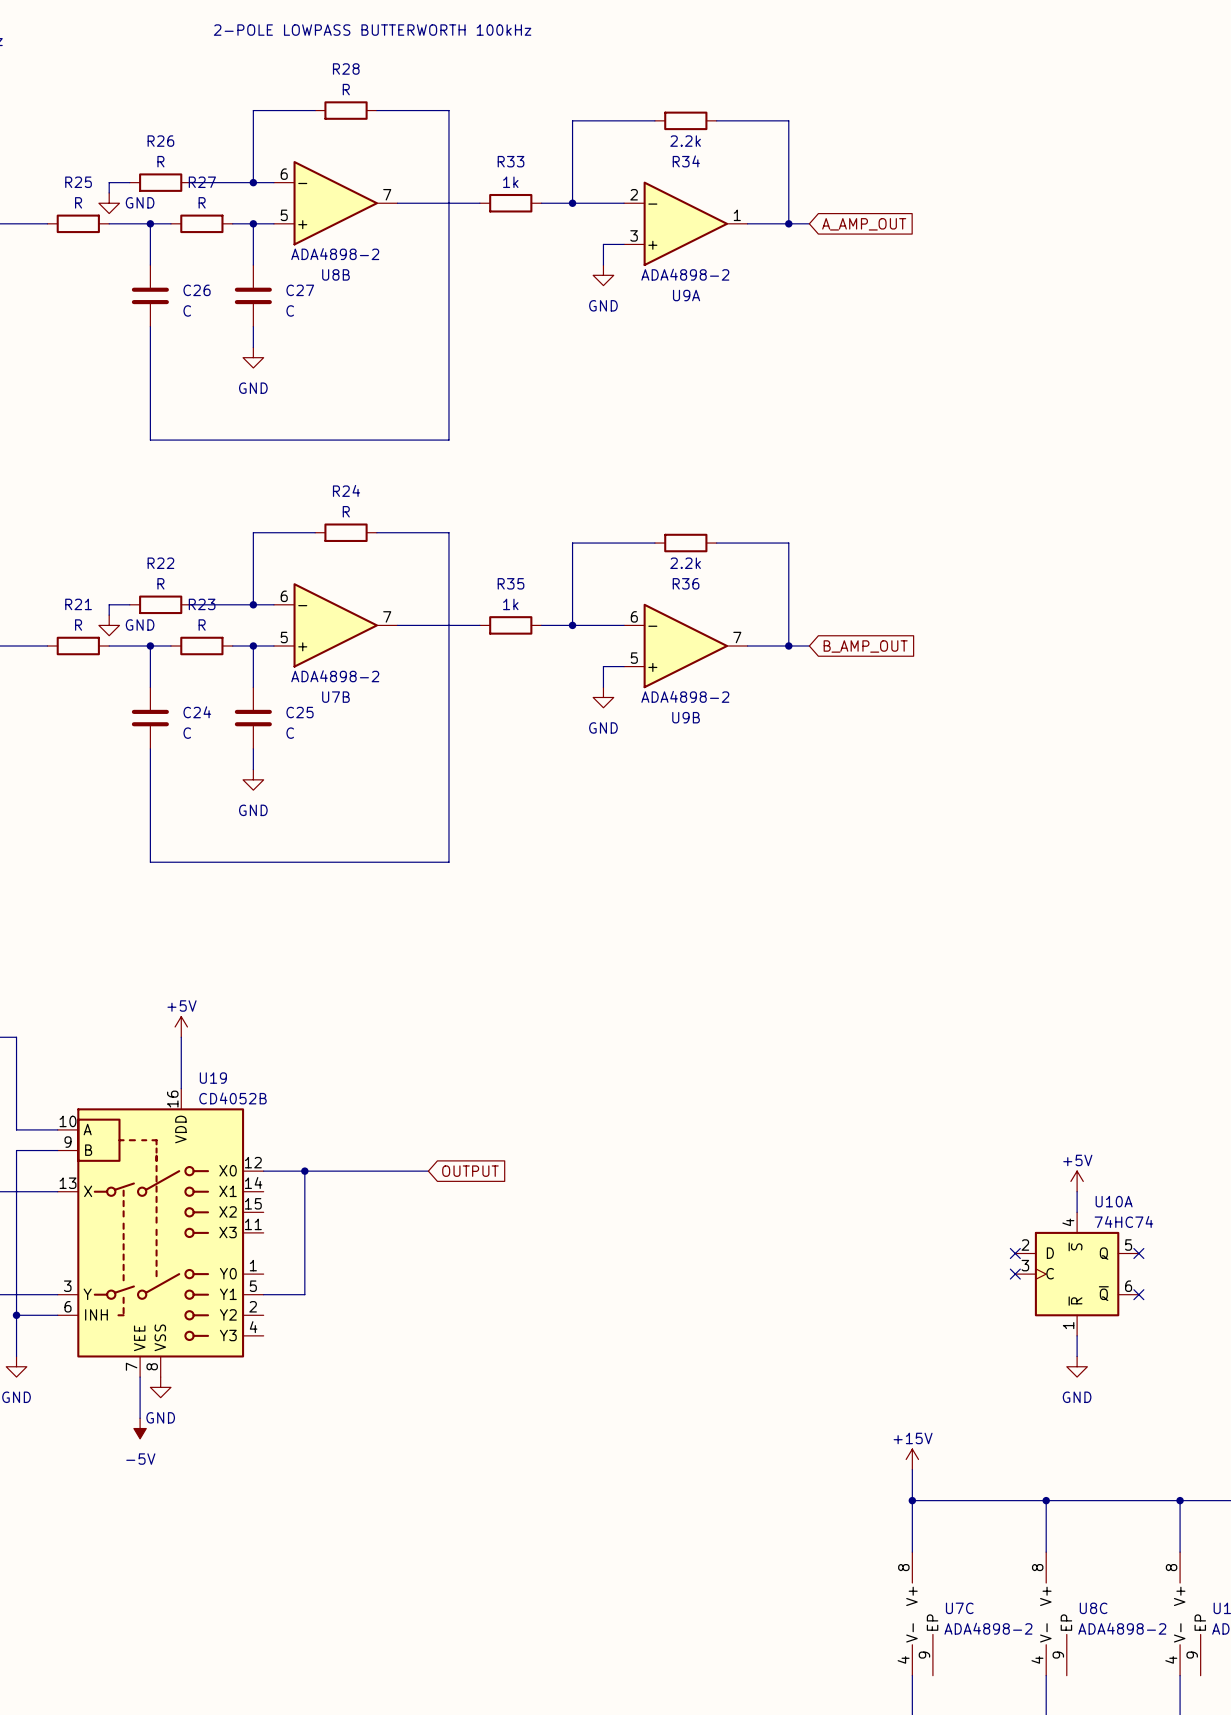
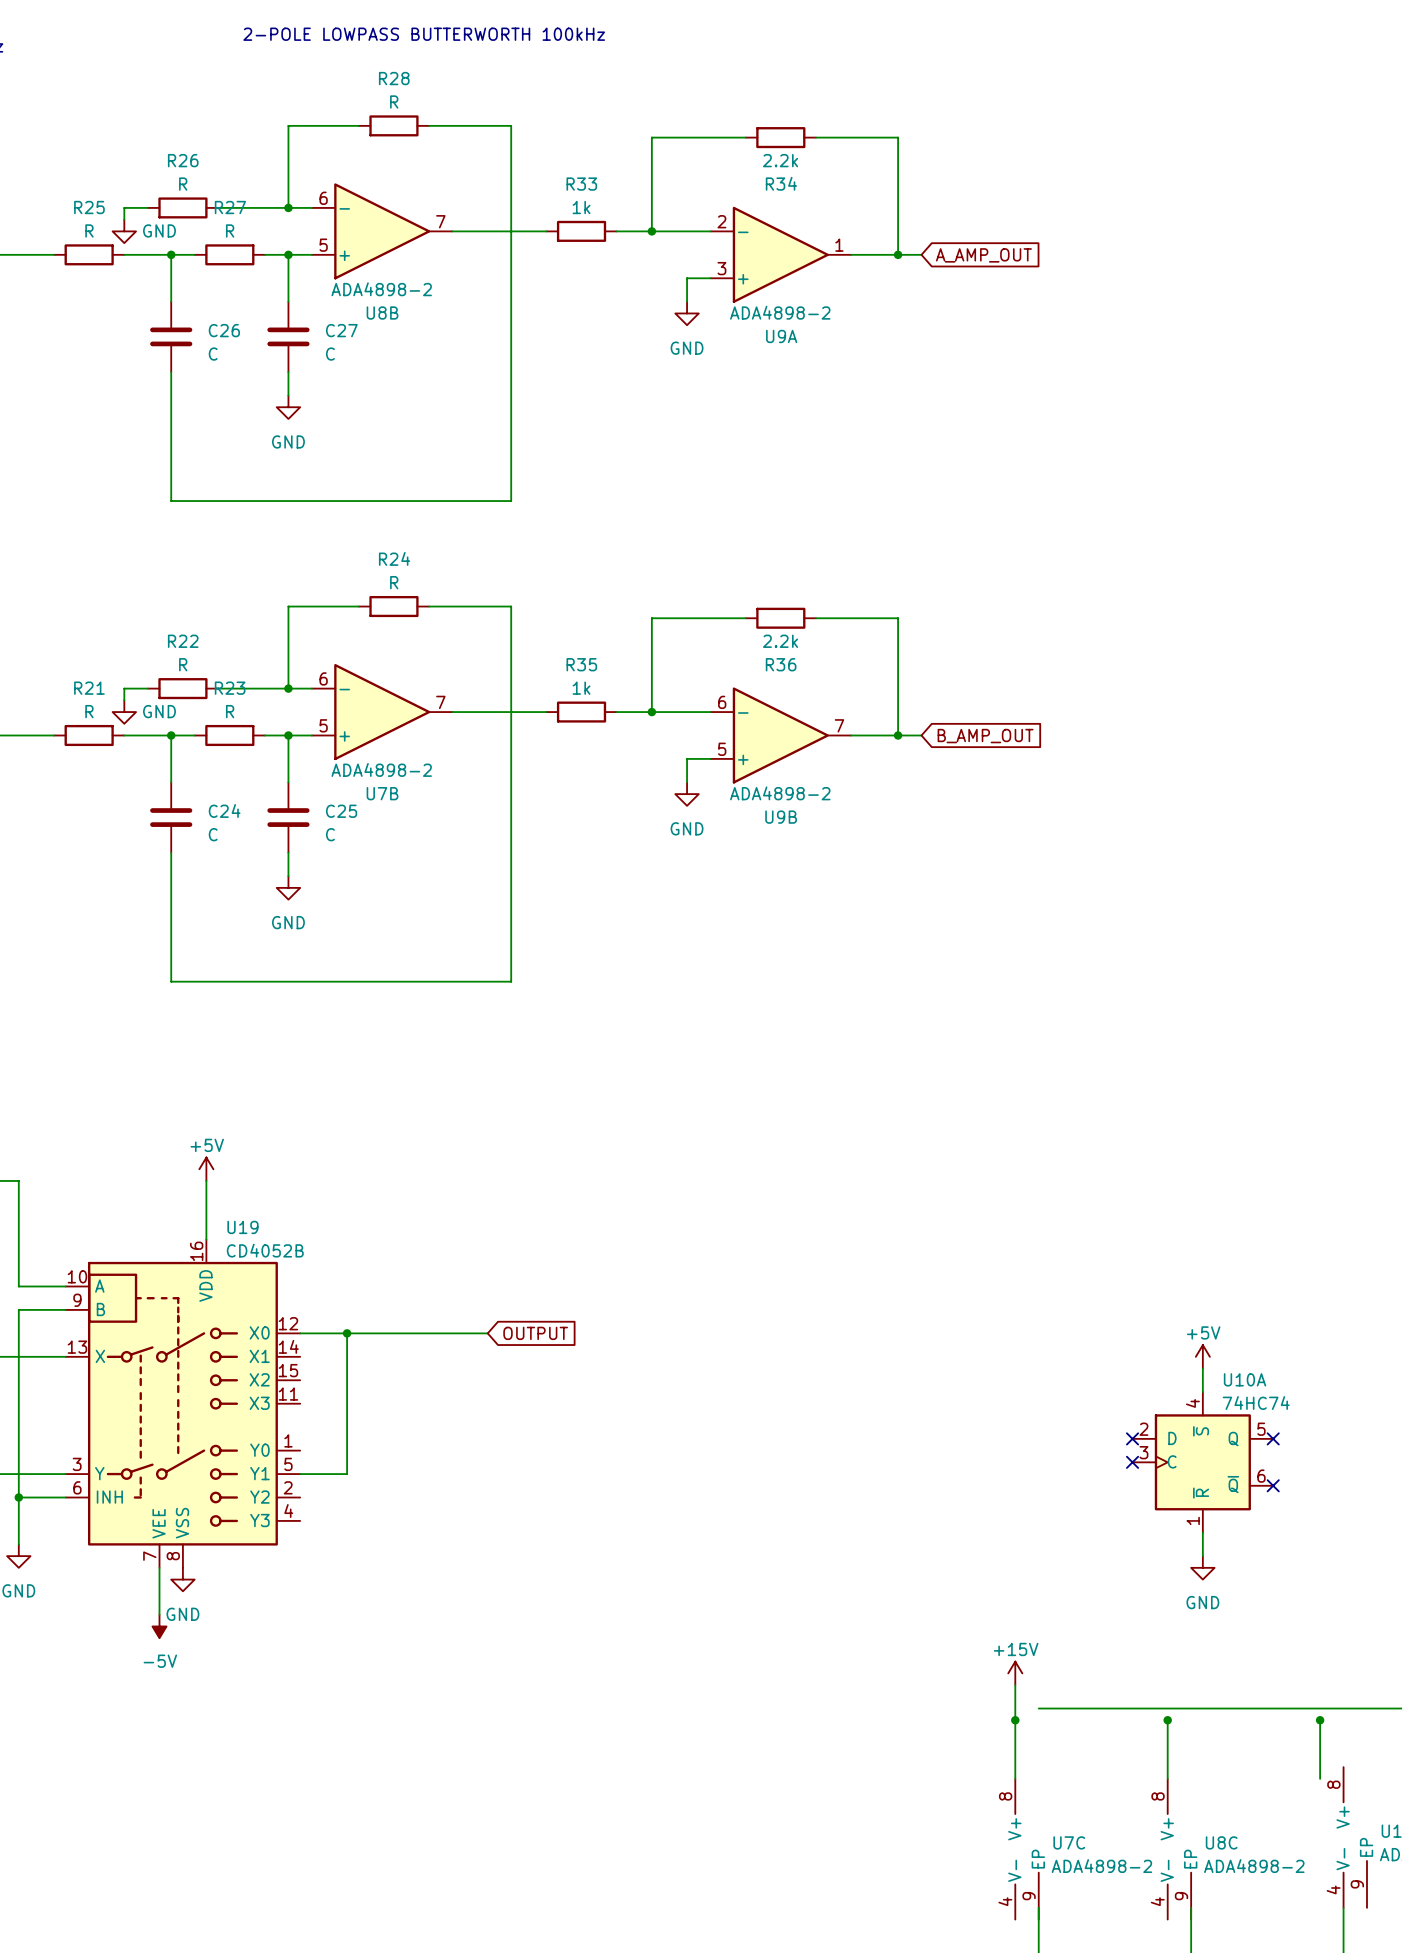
power symbol position: +5V (1077, 1181) -> +5V (1202, 1356)
wire: (1077, 1191) (1077, 1212) -> (1202, 1368) (1202, 1392)
no-connect mark: (1015, 1253) -> none
no-connect mark: (1138, 1253) -> none
no-connect mark: none -> (1132, 1438)
no-connect mark: none -> (1273, 1438)
no-connect mark: (1015, 1274) -> none
U10A position: (1077, 1274) -> (1202, 1462)
no-connect mark: none -> (1132, 1462)
no-connect mark: (1138, 1294) -> none
no-connect mark: none -> (1273, 1485)
wire: (1077, 1335) (1077, 1356) -> (1202, 1532) (1202, 1556)
power symbol position: GND (1077, 1366) -> GND (1202, 1567)
power symbol position: +15V (912, 1459) -> +15V (1015, 1673)
wire: (912, 1469) (912, 1552) -> (1015, 1685) (1015, 1778)
junction position: (912, 1500) -> (1015, 1720)
wire: (1046, 1500) (1046, 1552) -> (1167, 1720) (1167, 1778)
junction position: (1046, 1500) -> (1167, 1720)
wire: (1180, 1500) (1180, 1552) -> (1320, 1720) (1320, 1778)
junction position: (1180, 1500) -> (1320, 1720)
U7C position: (922, 1613) -> (1027, 1849)
U8C position: (1056, 1613) -> (1179, 1849)

